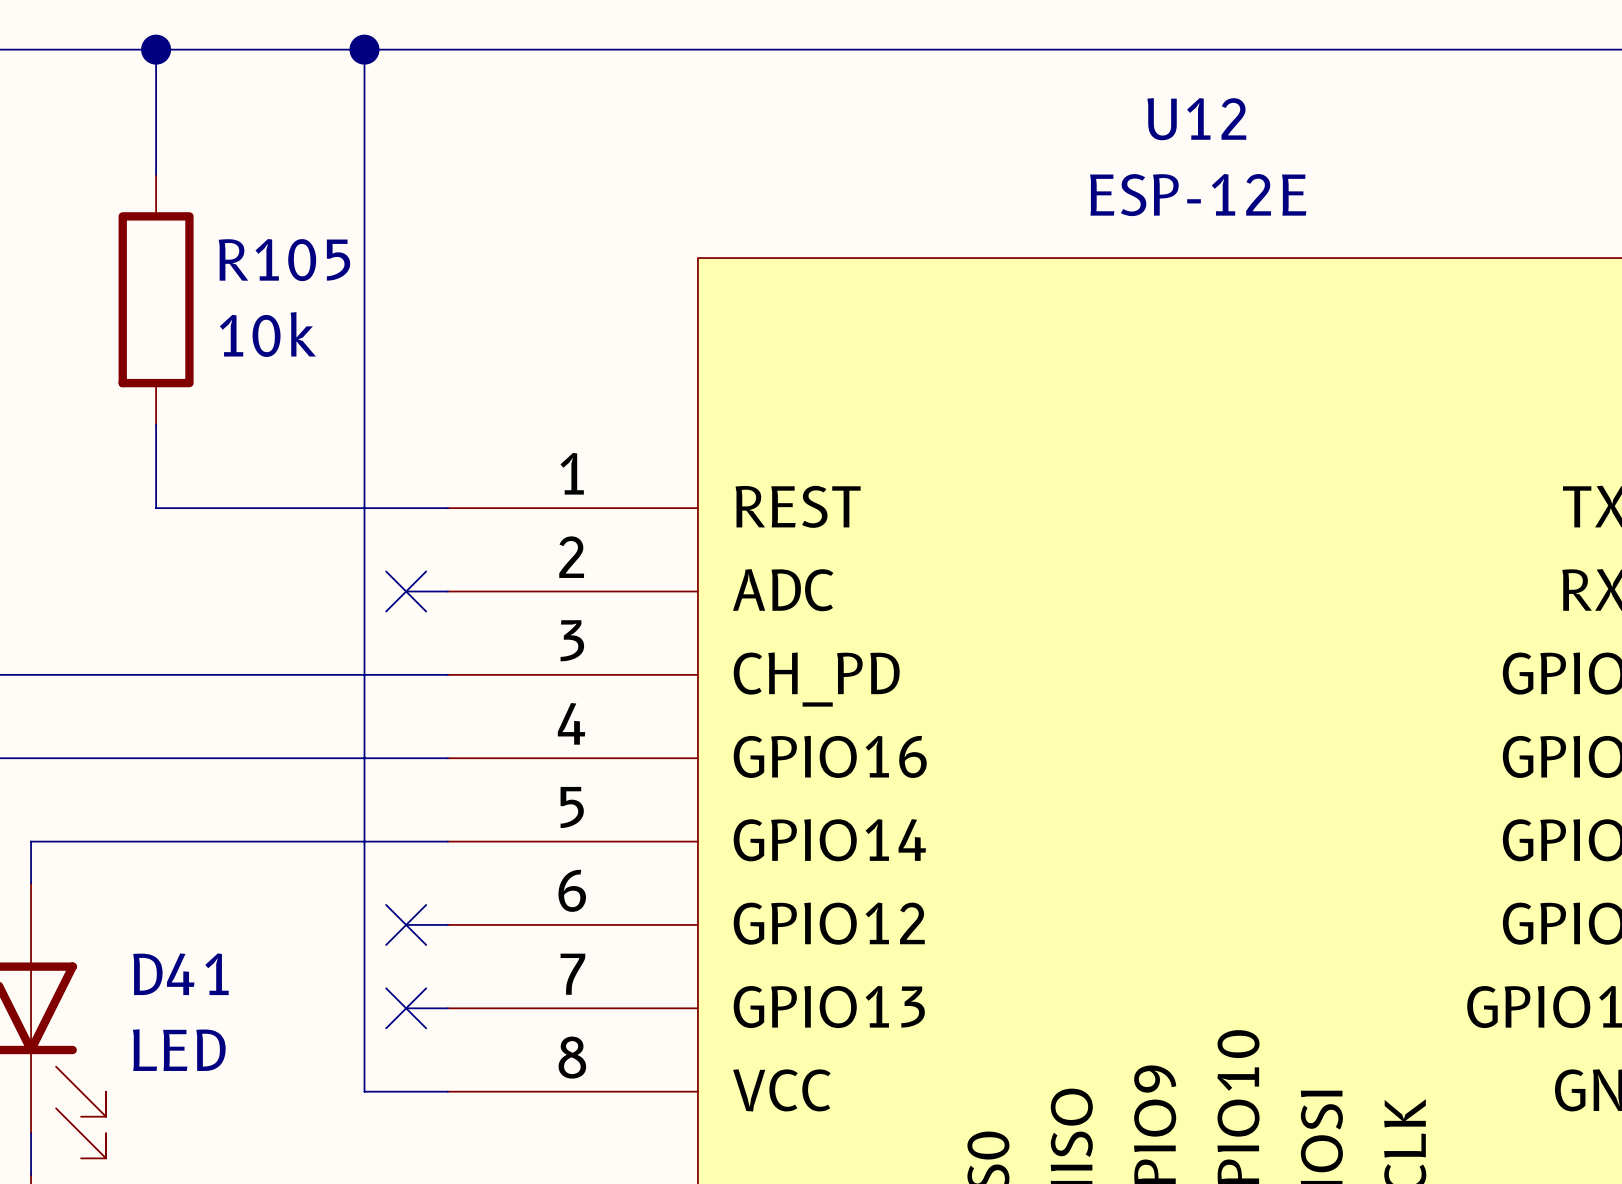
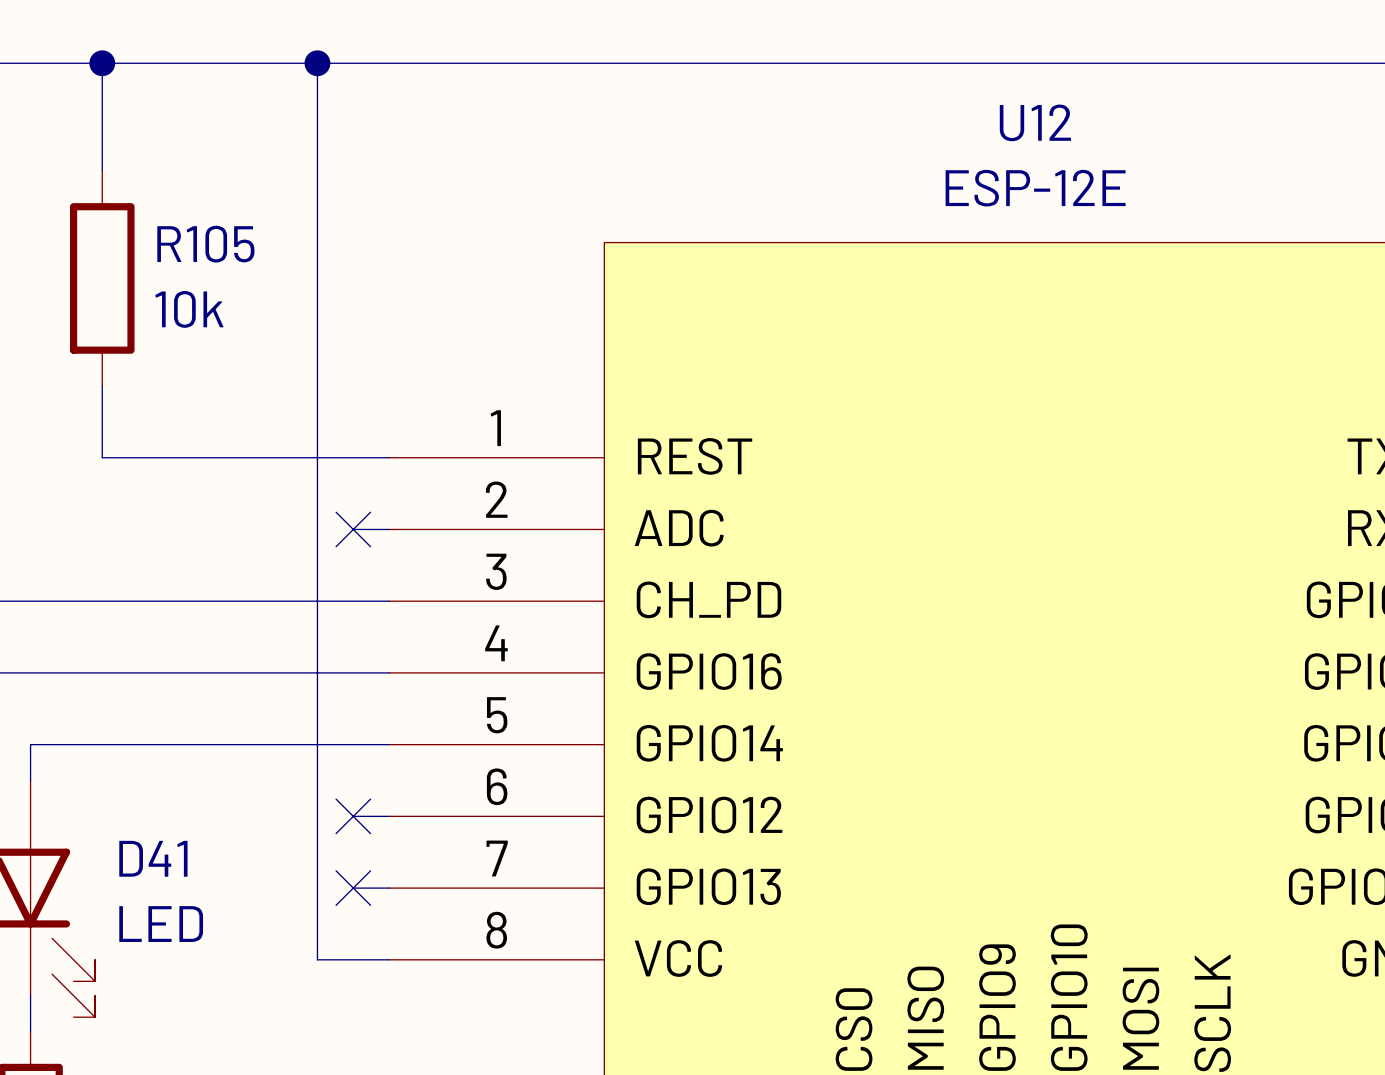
wire: (156, 49) (156, 174) -> (102, 63) (102, 170)
junction position: (156, 49) -> (102, 63)
R105 position: (156, 299) -> (102, 278)
wire: (156, 424) (156, 508) -> (102, 386) (102, 457) (138, 457)

